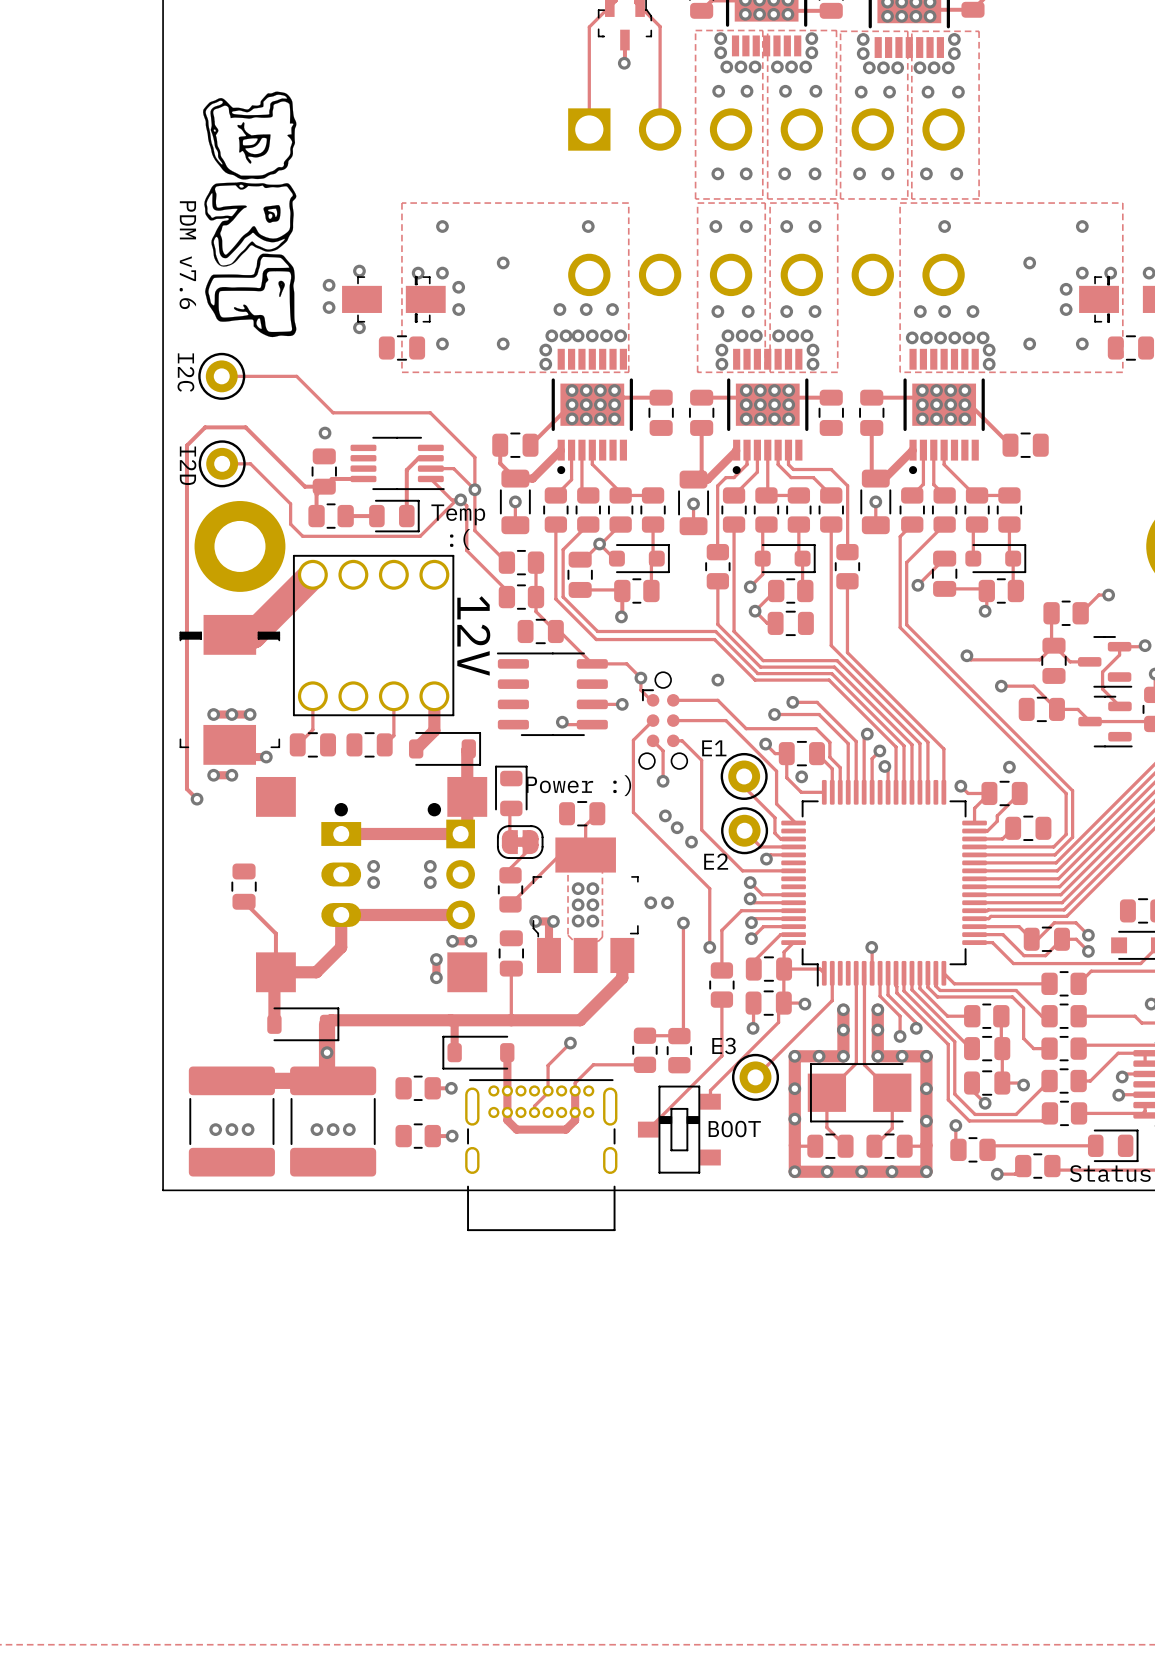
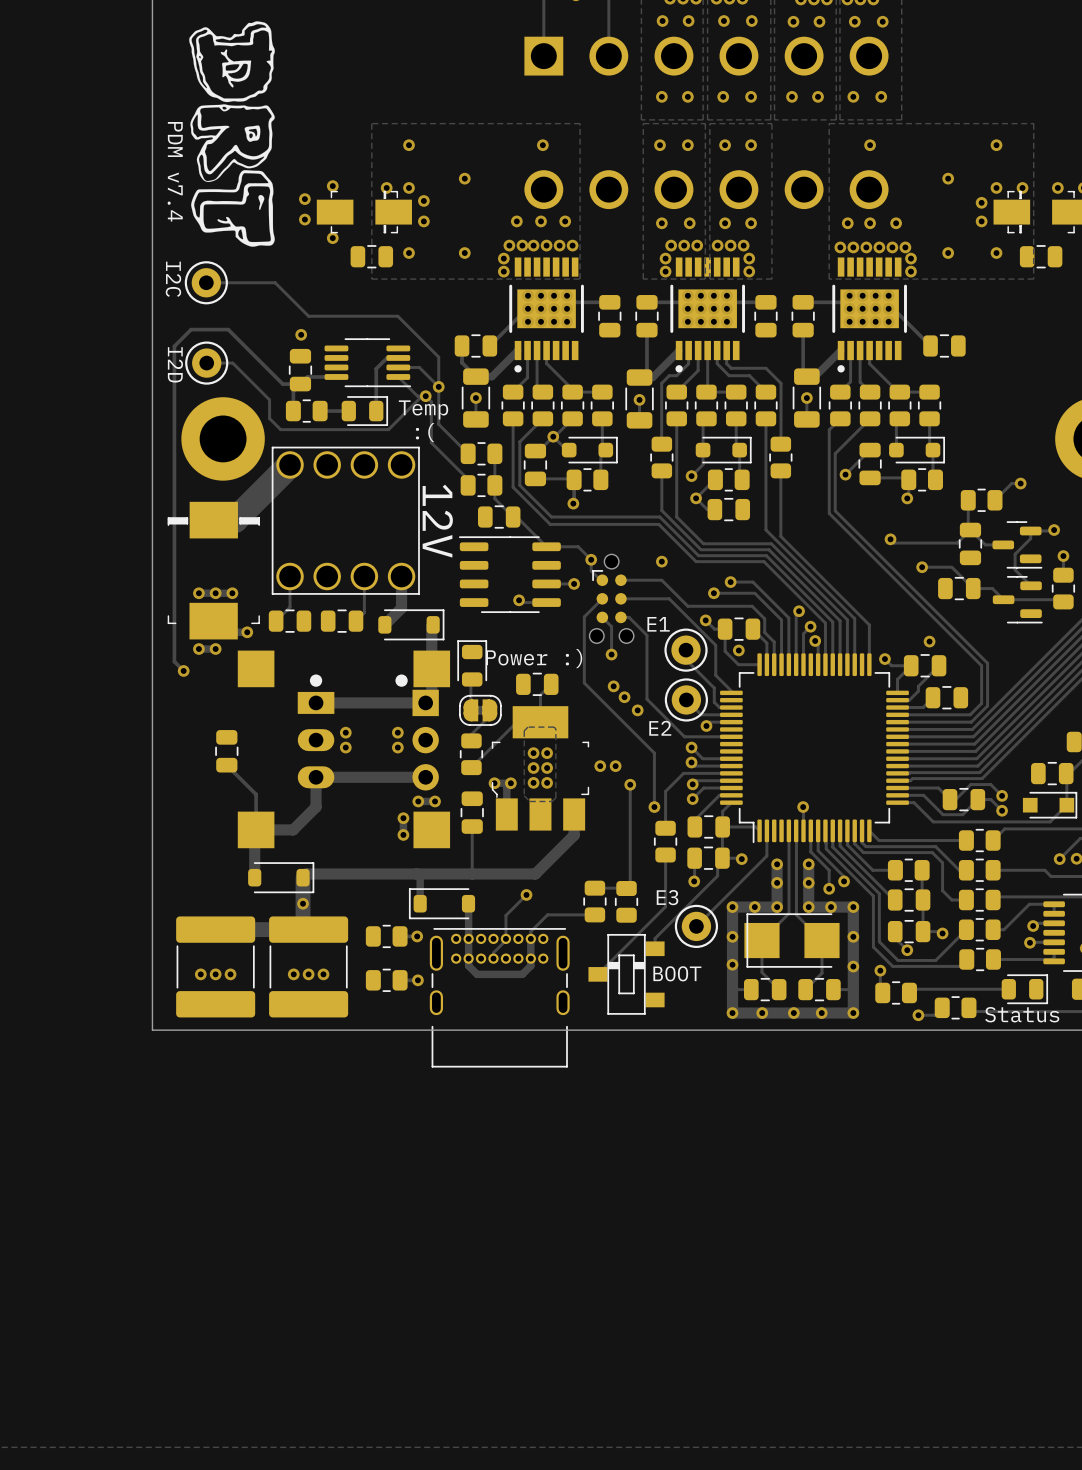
text: PDM v7.6 (187, 255) -> PDM v7.4 (175, 171)

